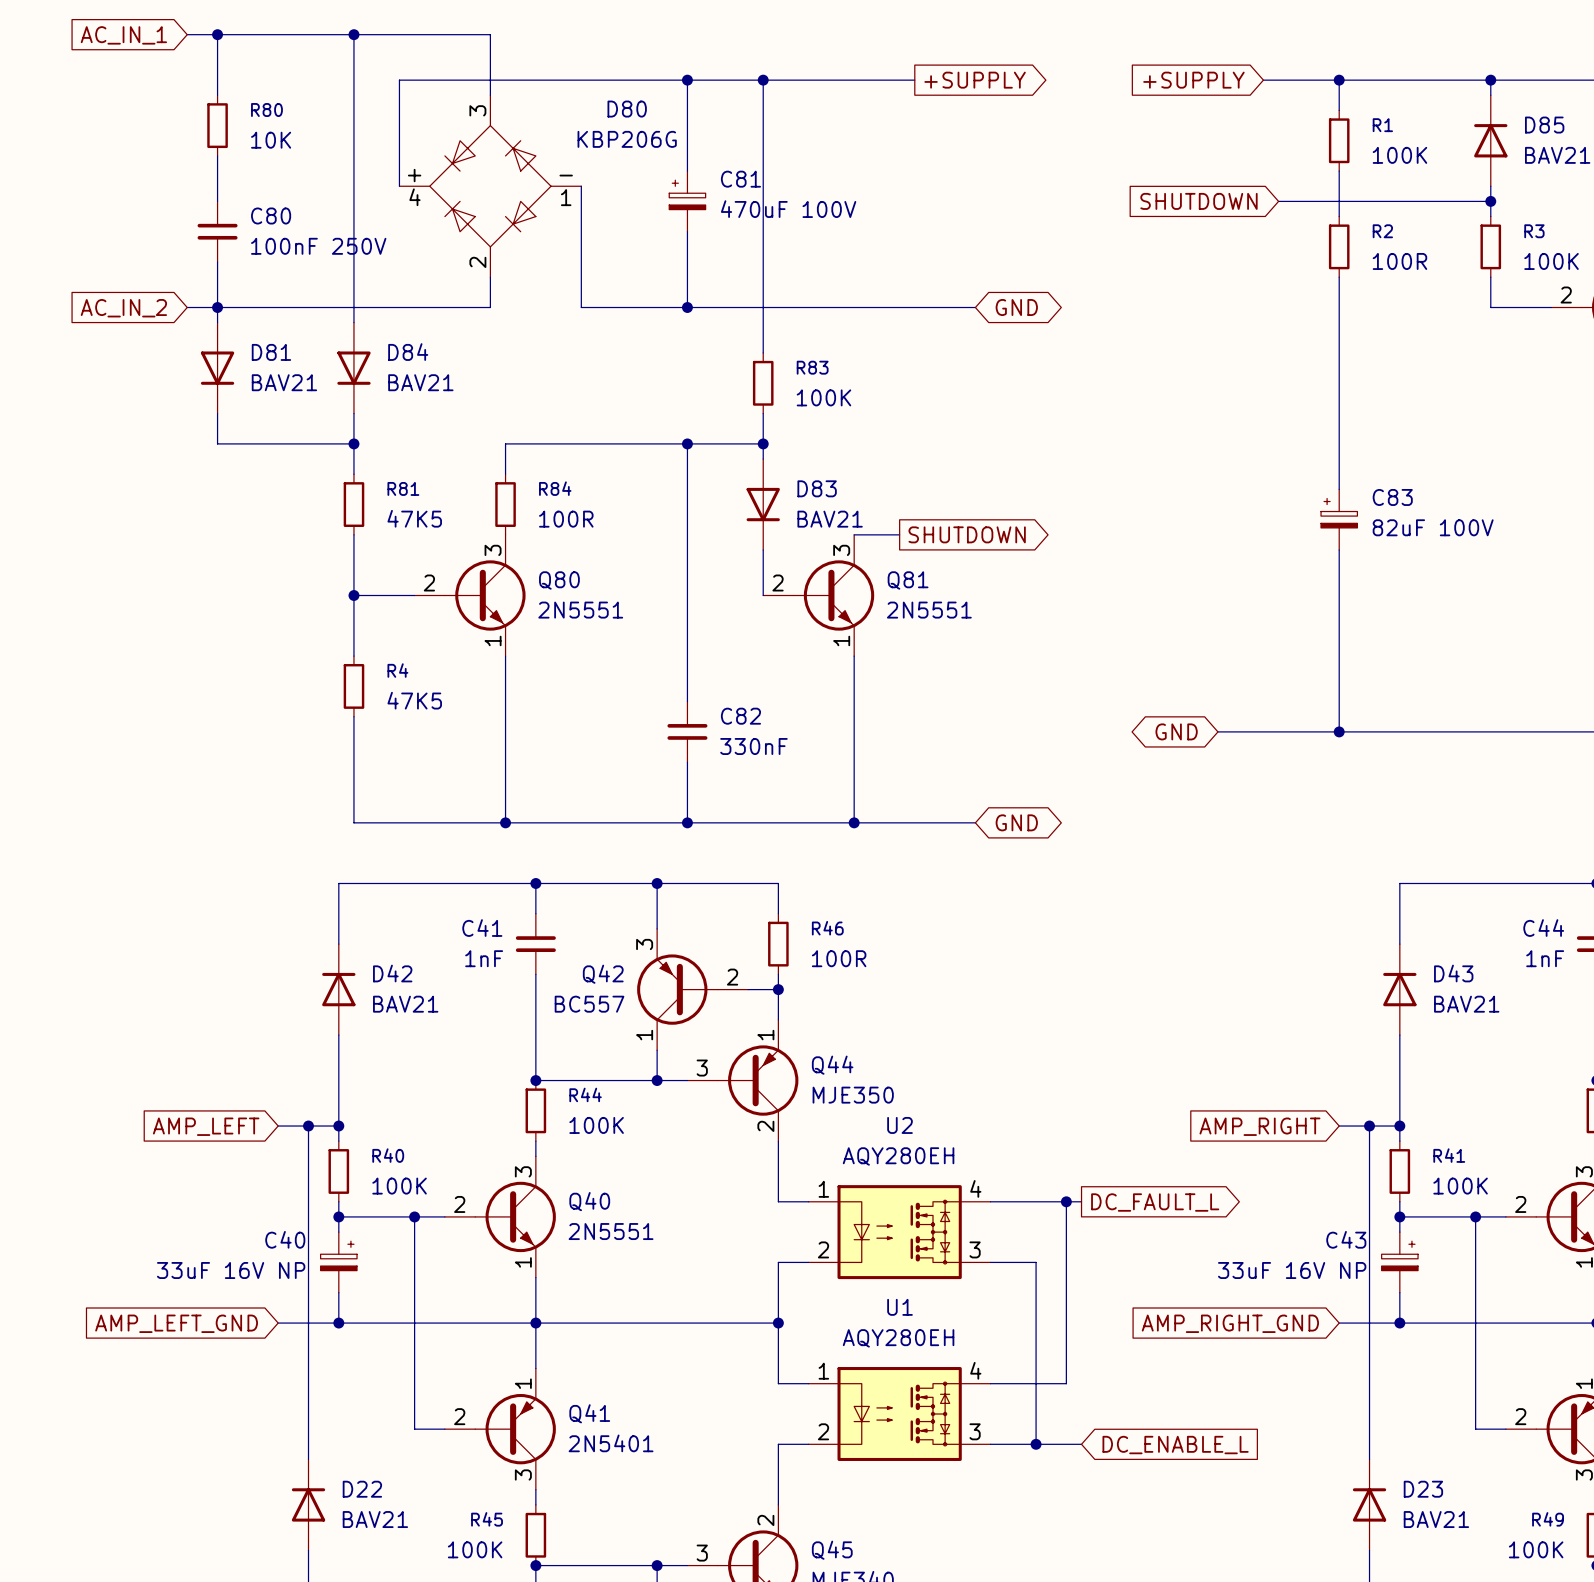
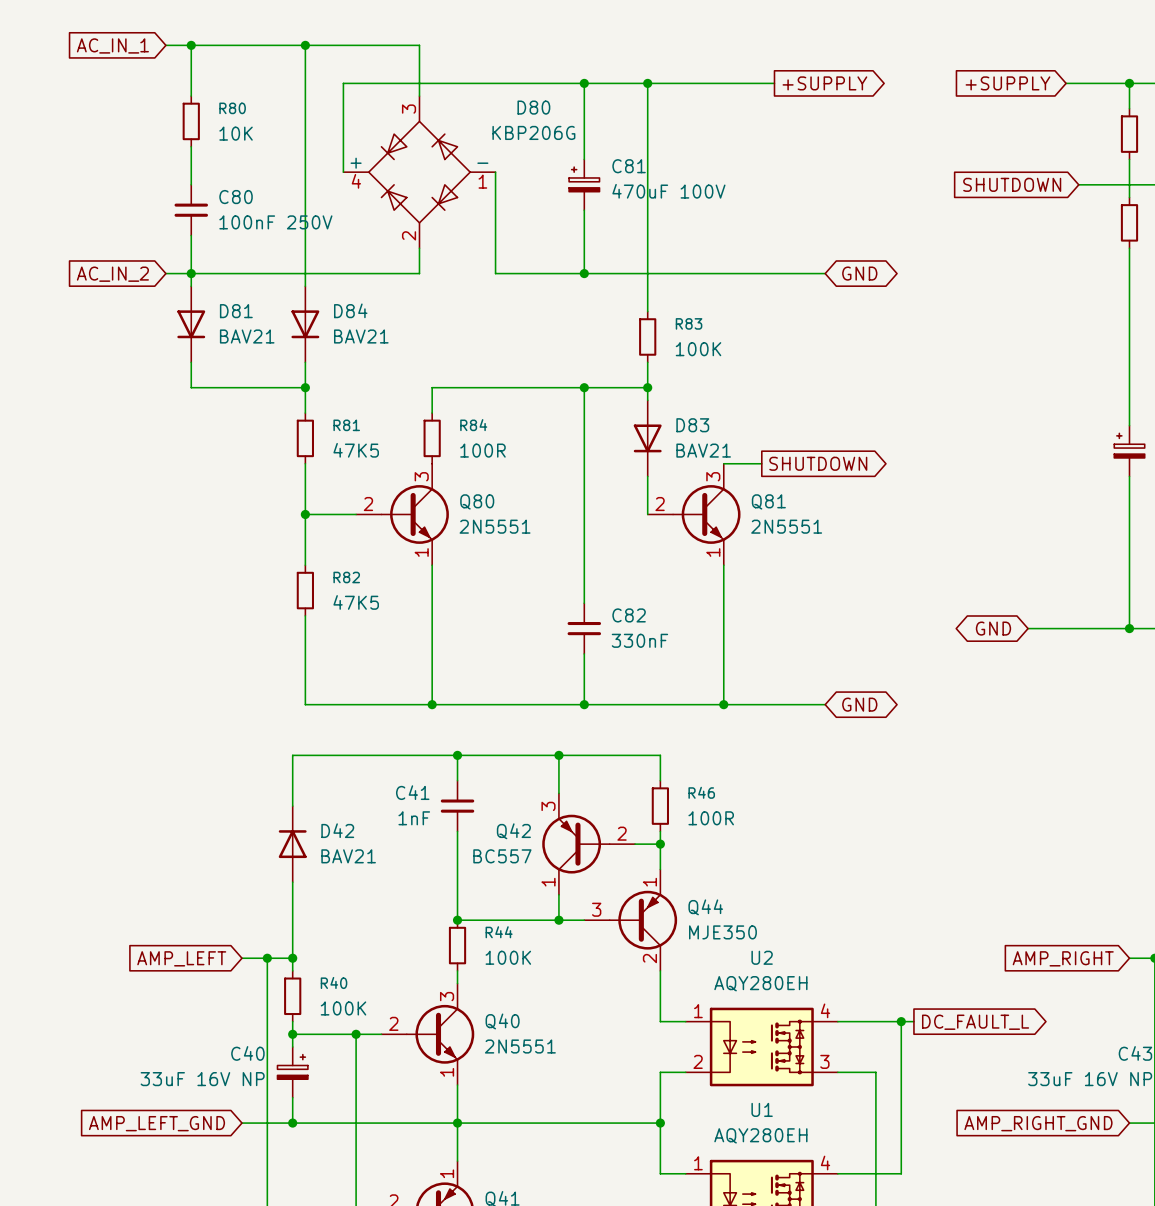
R4 name: R4 (397, 670) -> R82 (346, 577)

